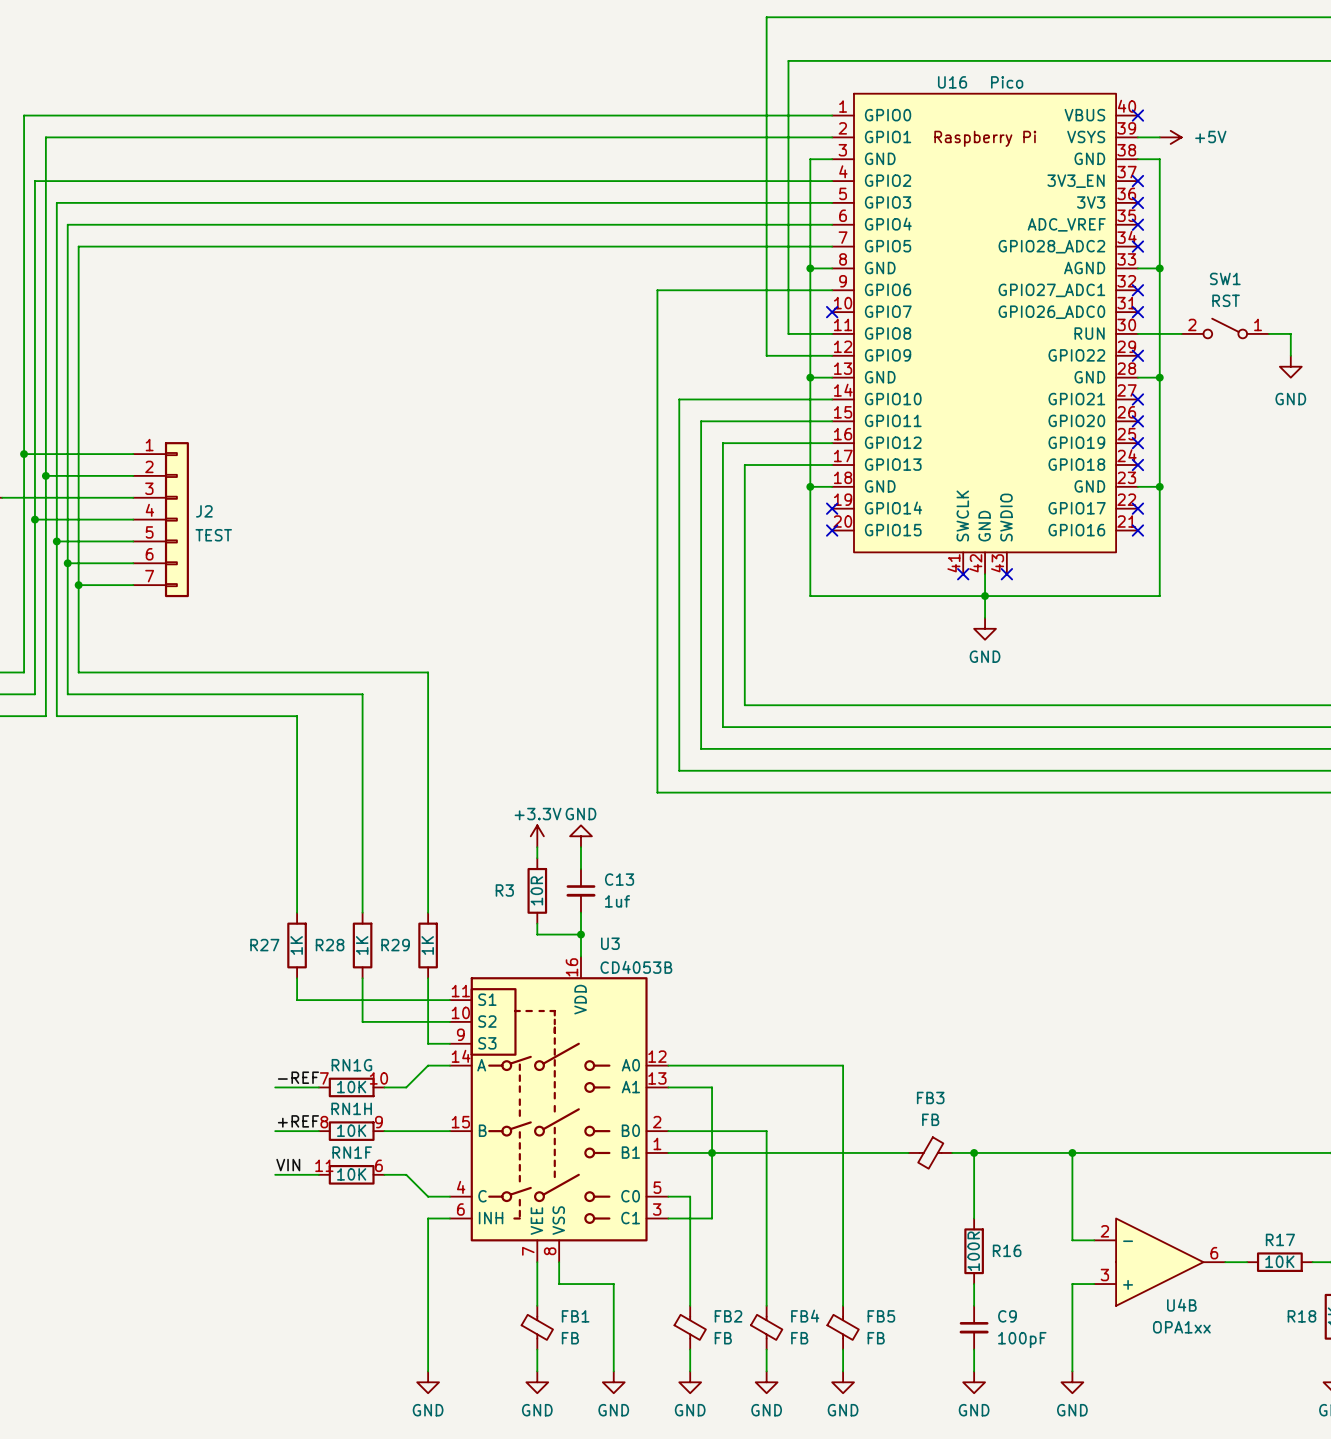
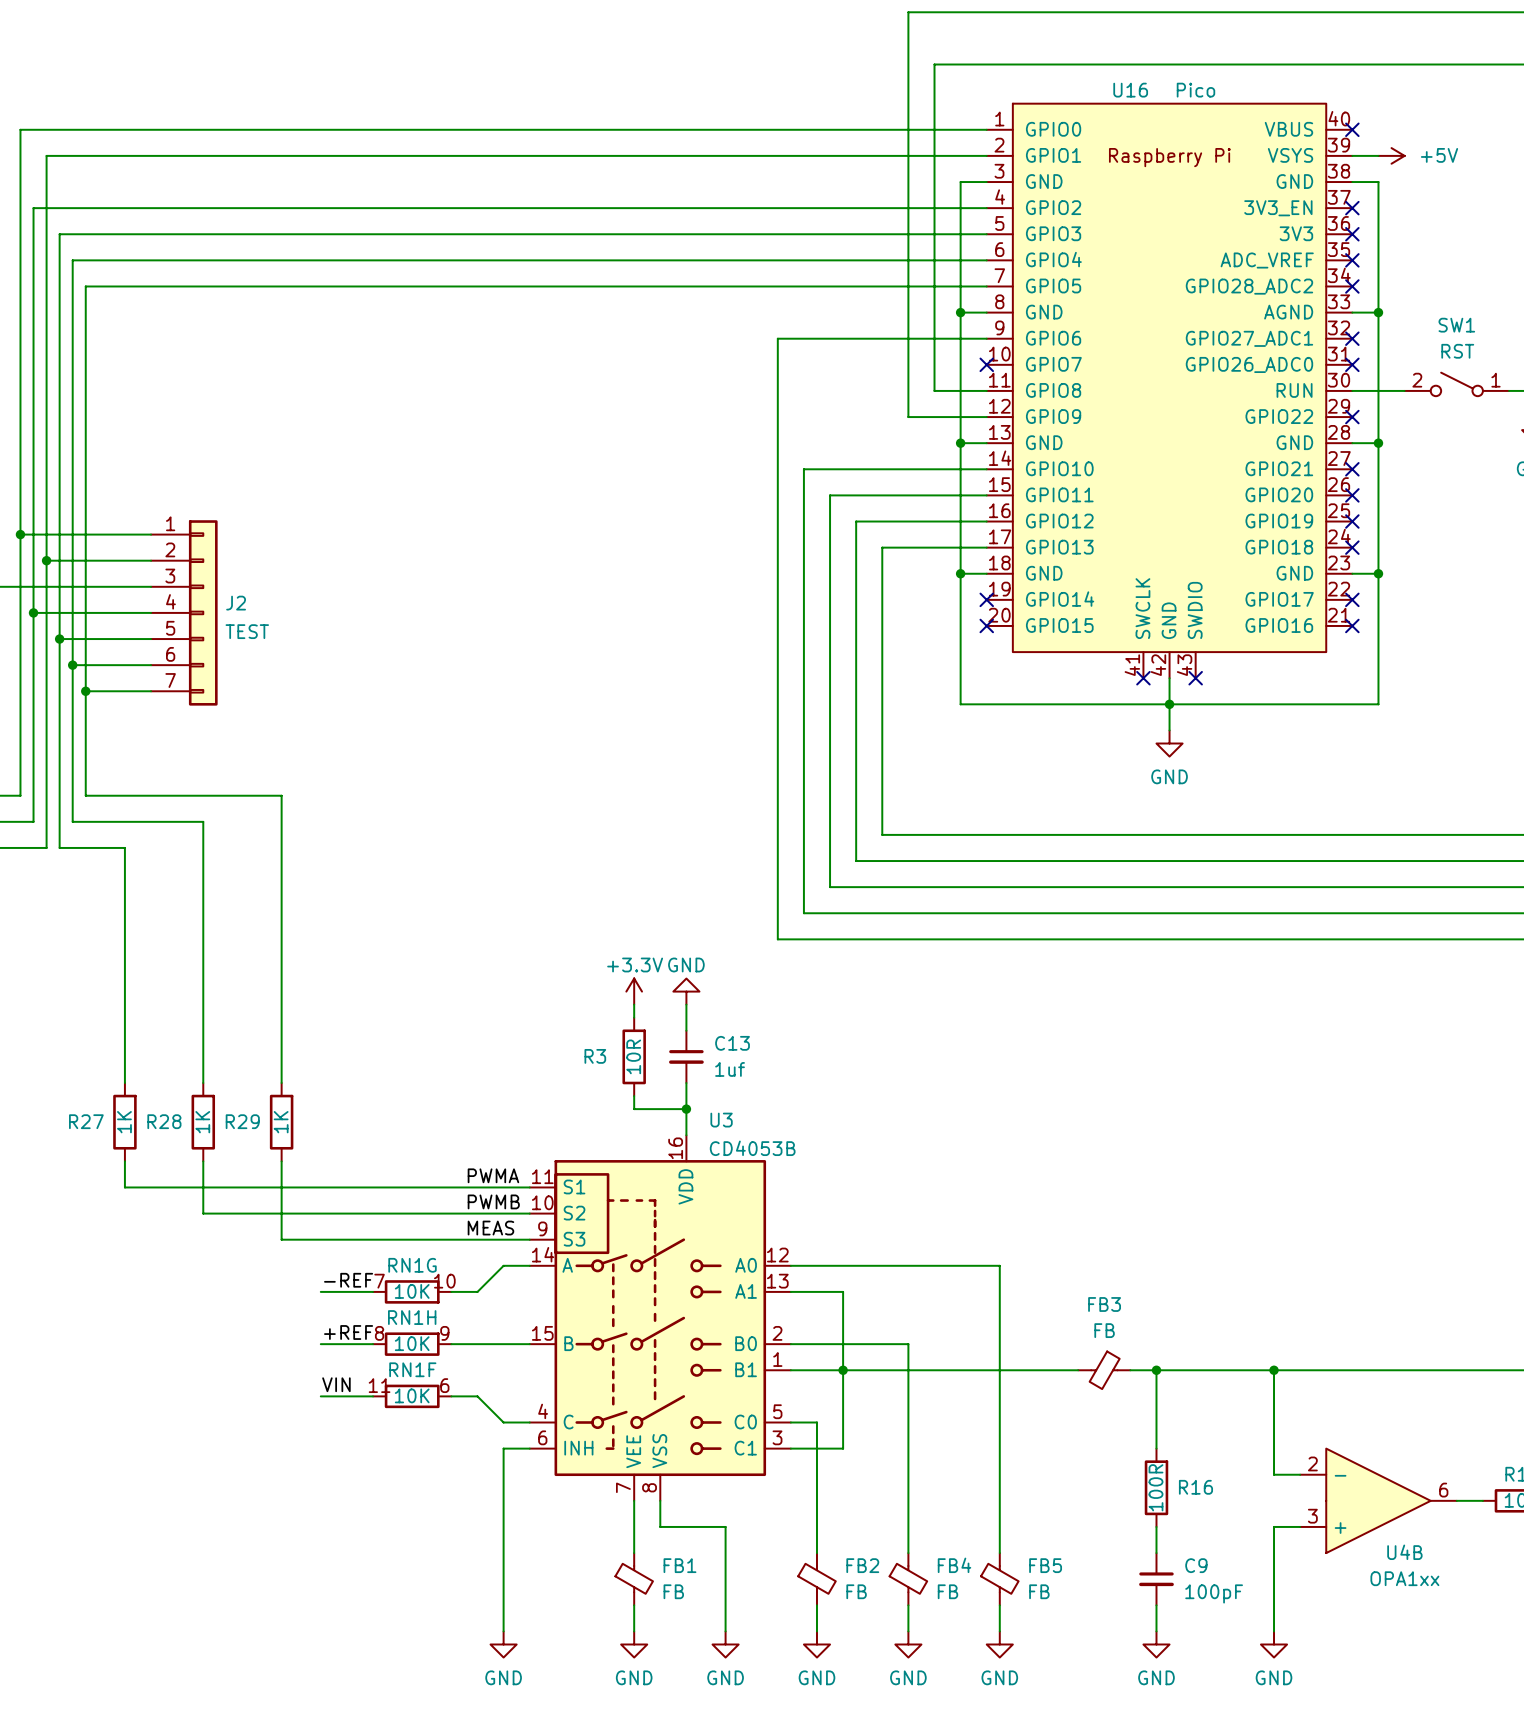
wire: (242, 672) (428, 672) (428, 912) -> (281, 795) (281, 1083)
wire: (176, 694) (362, 694) (362, 912) -> (203, 821) (203, 1083)
wire: (111, 716) (297, 716) (297, 912) -> (124, 847) (124, 1083)
R27 position: (297, 945) -> (124, 1122)
R28 position: (362, 945) -> (203, 1122)
R29 position: (428, 945) -> (281, 1122)
wire: (297, 978) (297, 1000) -> (124, 1161) (124, 1187) (346, 1187)
wire: (362, 978) (362, 1021) -> (203, 1161) (203, 1213) (425, 1213)
wire: (428, 978) (428, 1043) -> (281, 1161) (281, 1239) (503, 1239)
label: none -> PWMA (493, 1175)
label: none -> PWMB (493, 1201)
label: none -> MEAS (490, 1228)

